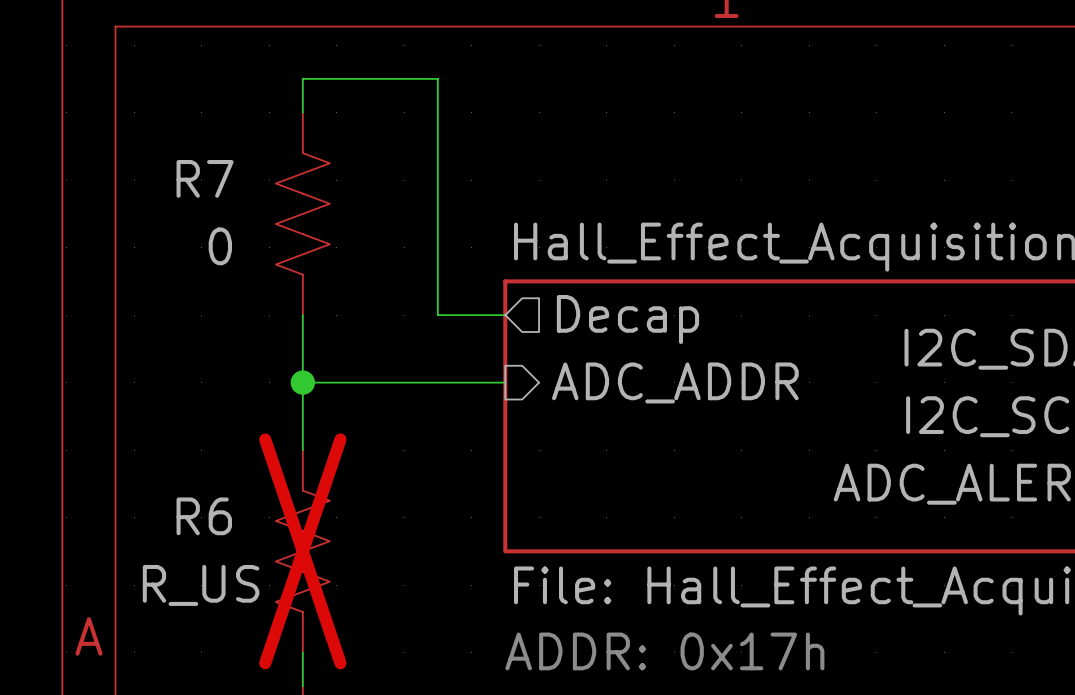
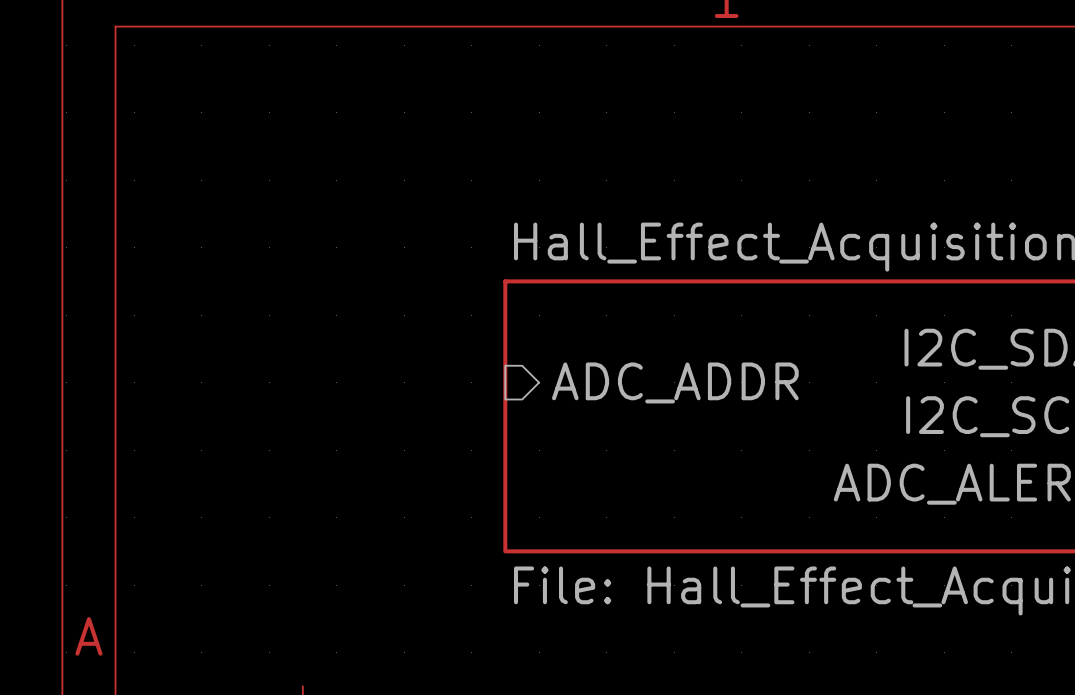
wire: (302, 112) (302, 78) (437, 78) (437, 315) (505, 315) -> none
R7: 0 (302, 213) -> none
wire: (302, 315) (302, 450) -> none
sheet pin: Decap (627, 319) -> none
wire: (302, 382) (505, 382) -> none
junction: (302, 382) -> none
R6: R_US (302, 551) -> none
text: ADDR: 0x17h (664, 651) -> none
wire: (302, 652) (302, 686) -> none

